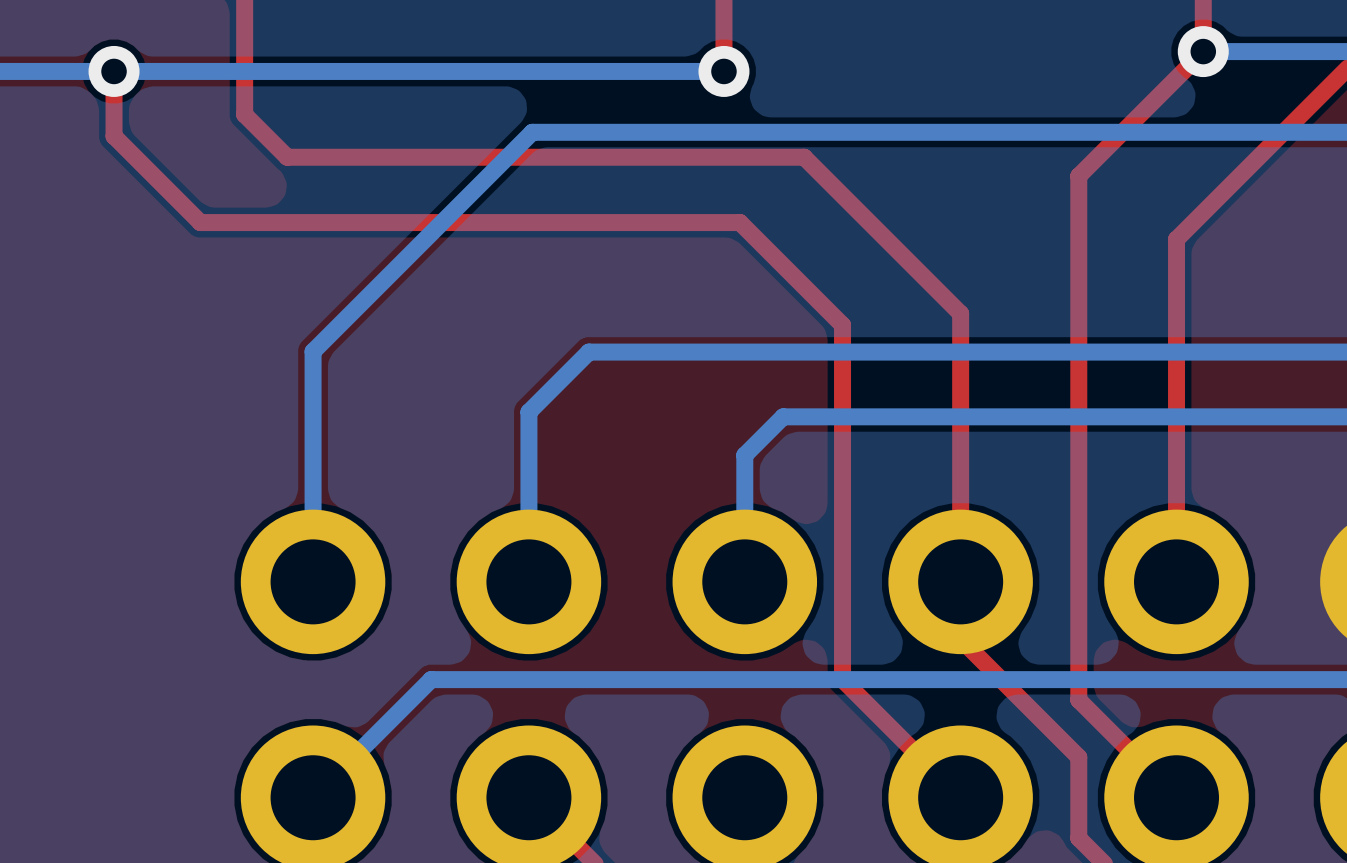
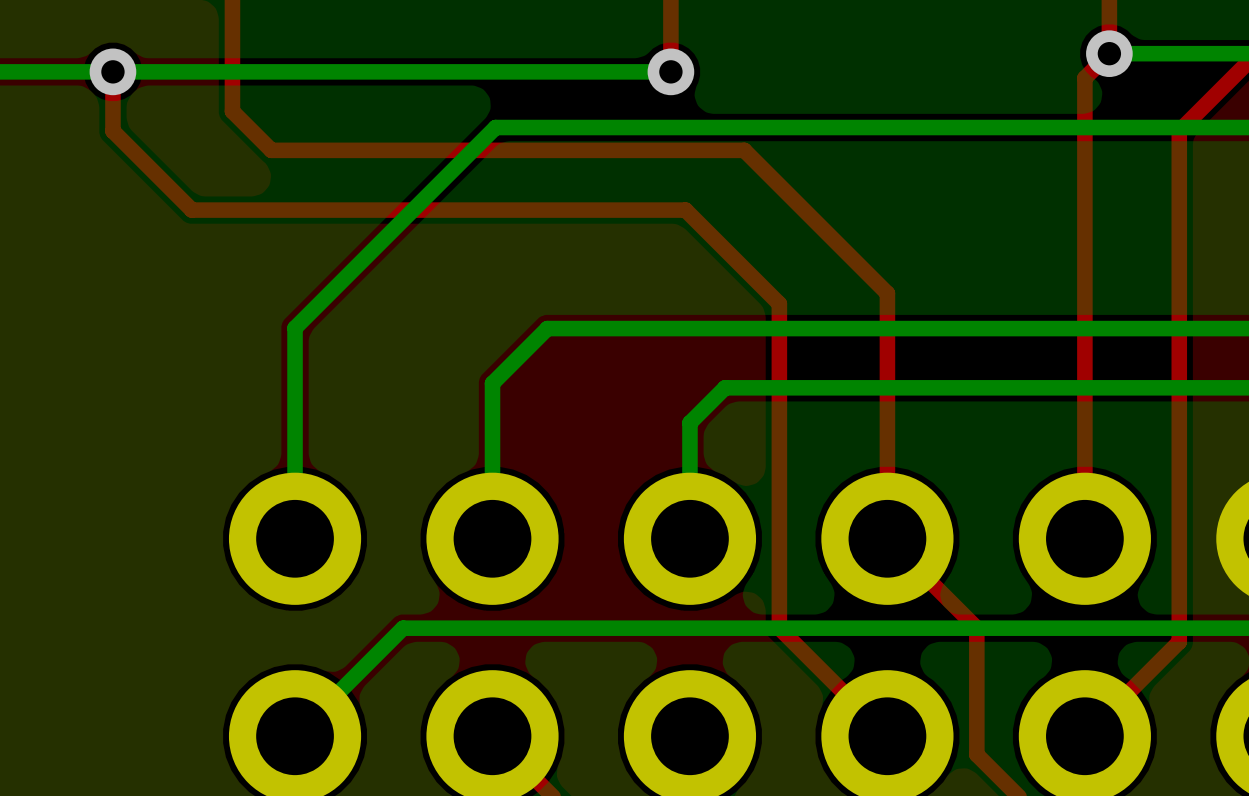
top track: (1176, 78) (1078, 176) (1078, 700) (1176, 797) -> (1179, 131) (1179, 641) (1084, 736)
top track: (1279, 136) (1176, 239) -> (1084, 78) (1084, 225)
top track: (960, 581) (960, 639) (1078, 757) (1078, 838) -> (887, 538) (976, 628) (976, 754) (995, 773)

